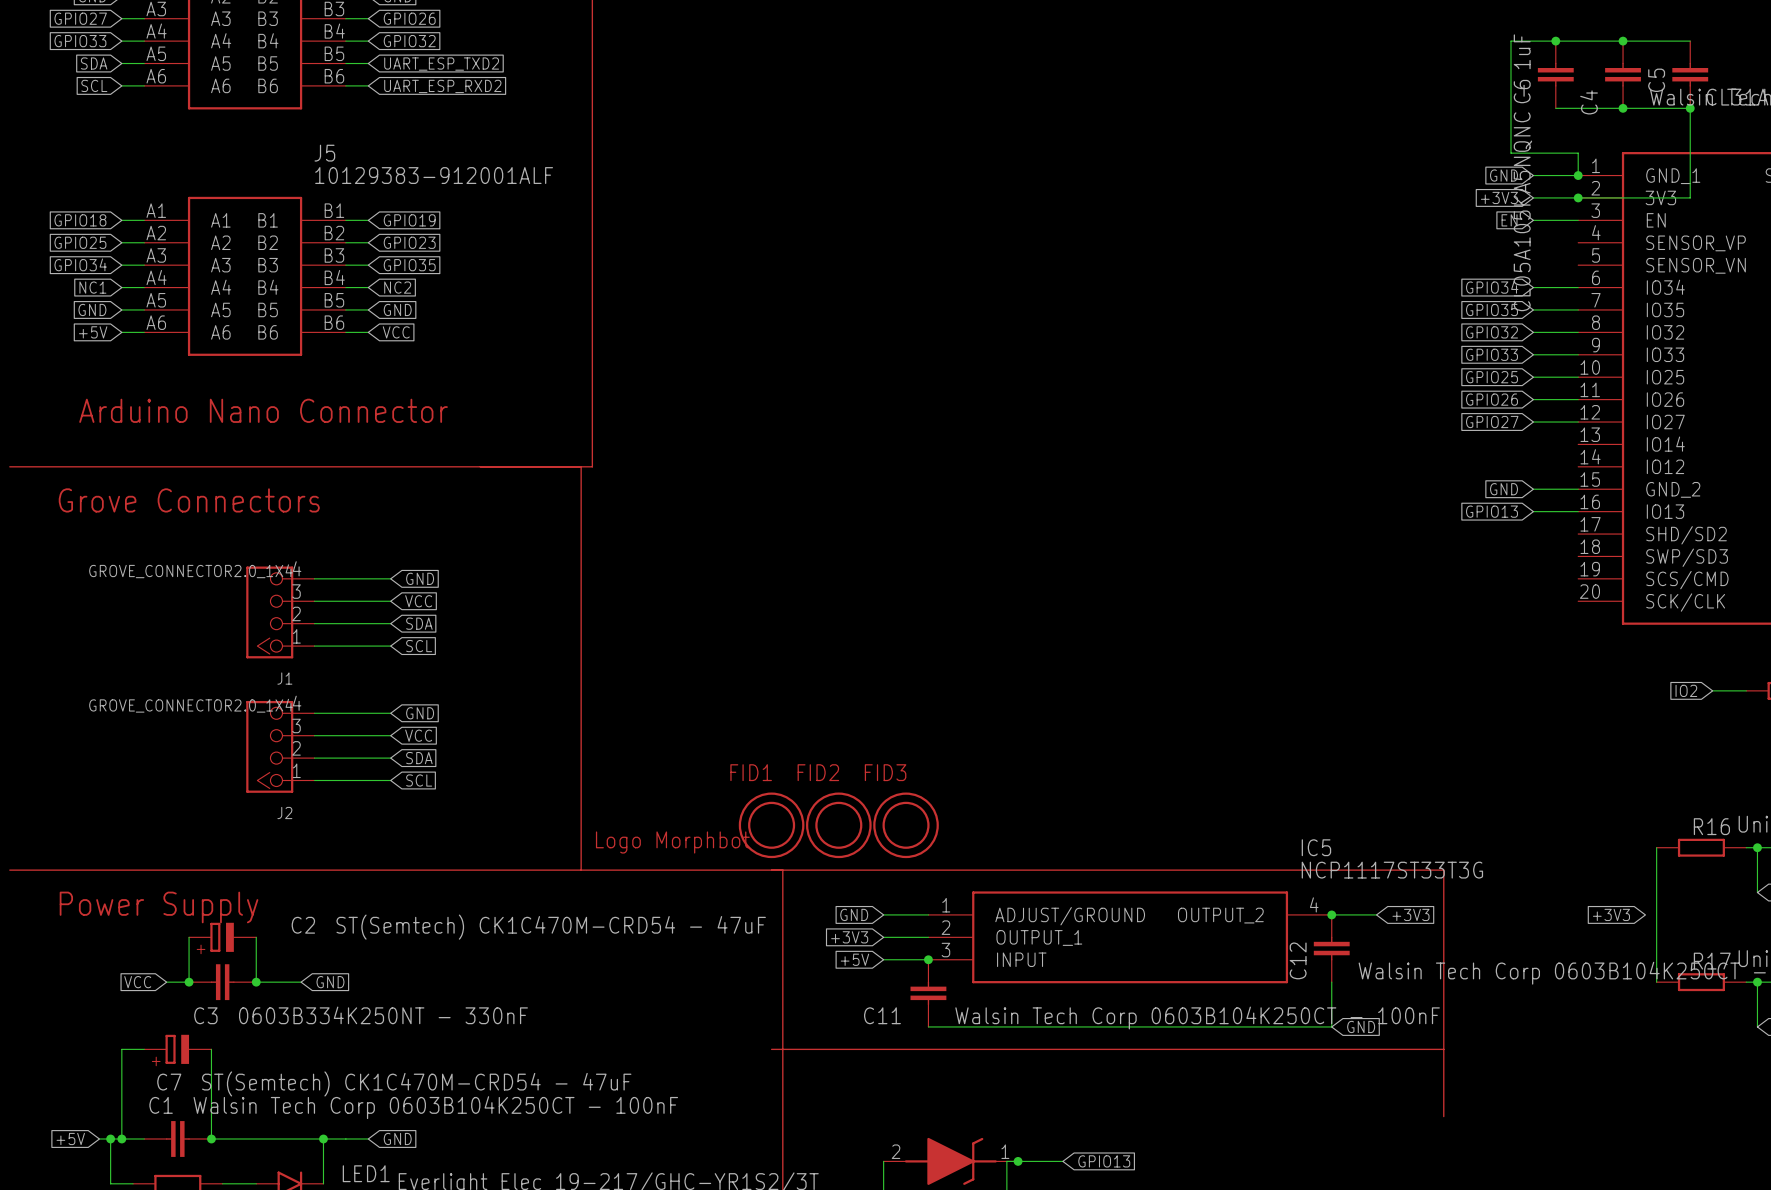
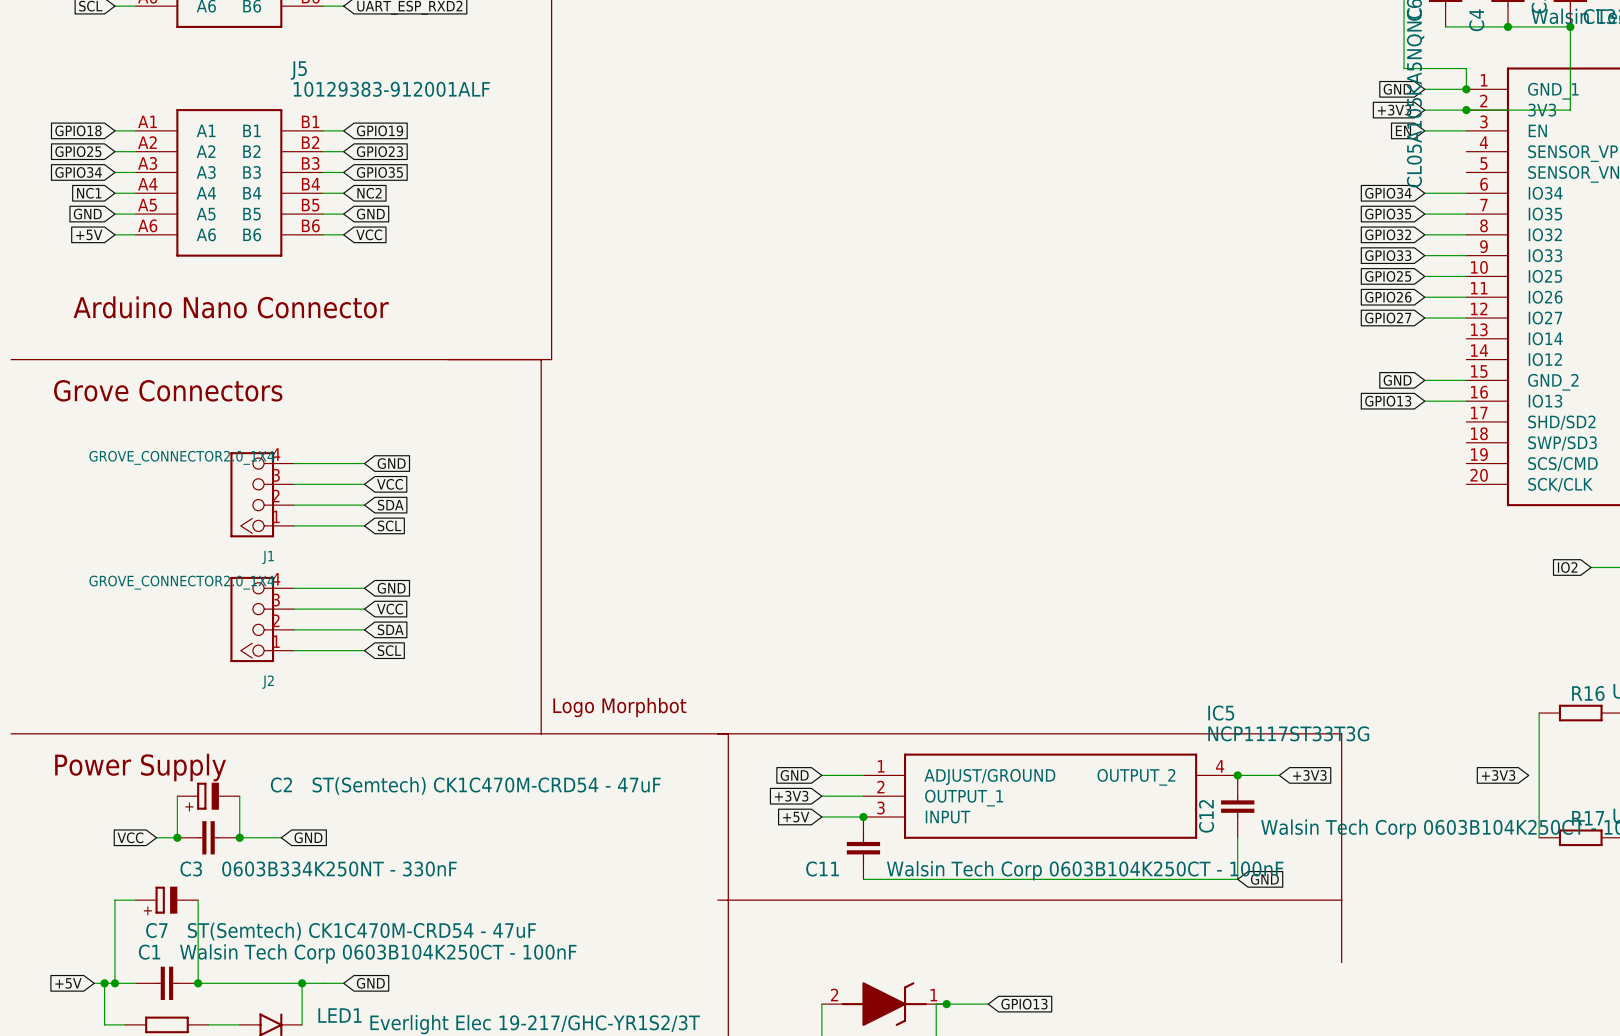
FID1: (771, 825) -> none
FID2: (838, 825) -> none
FID3: (906, 825) -> none

